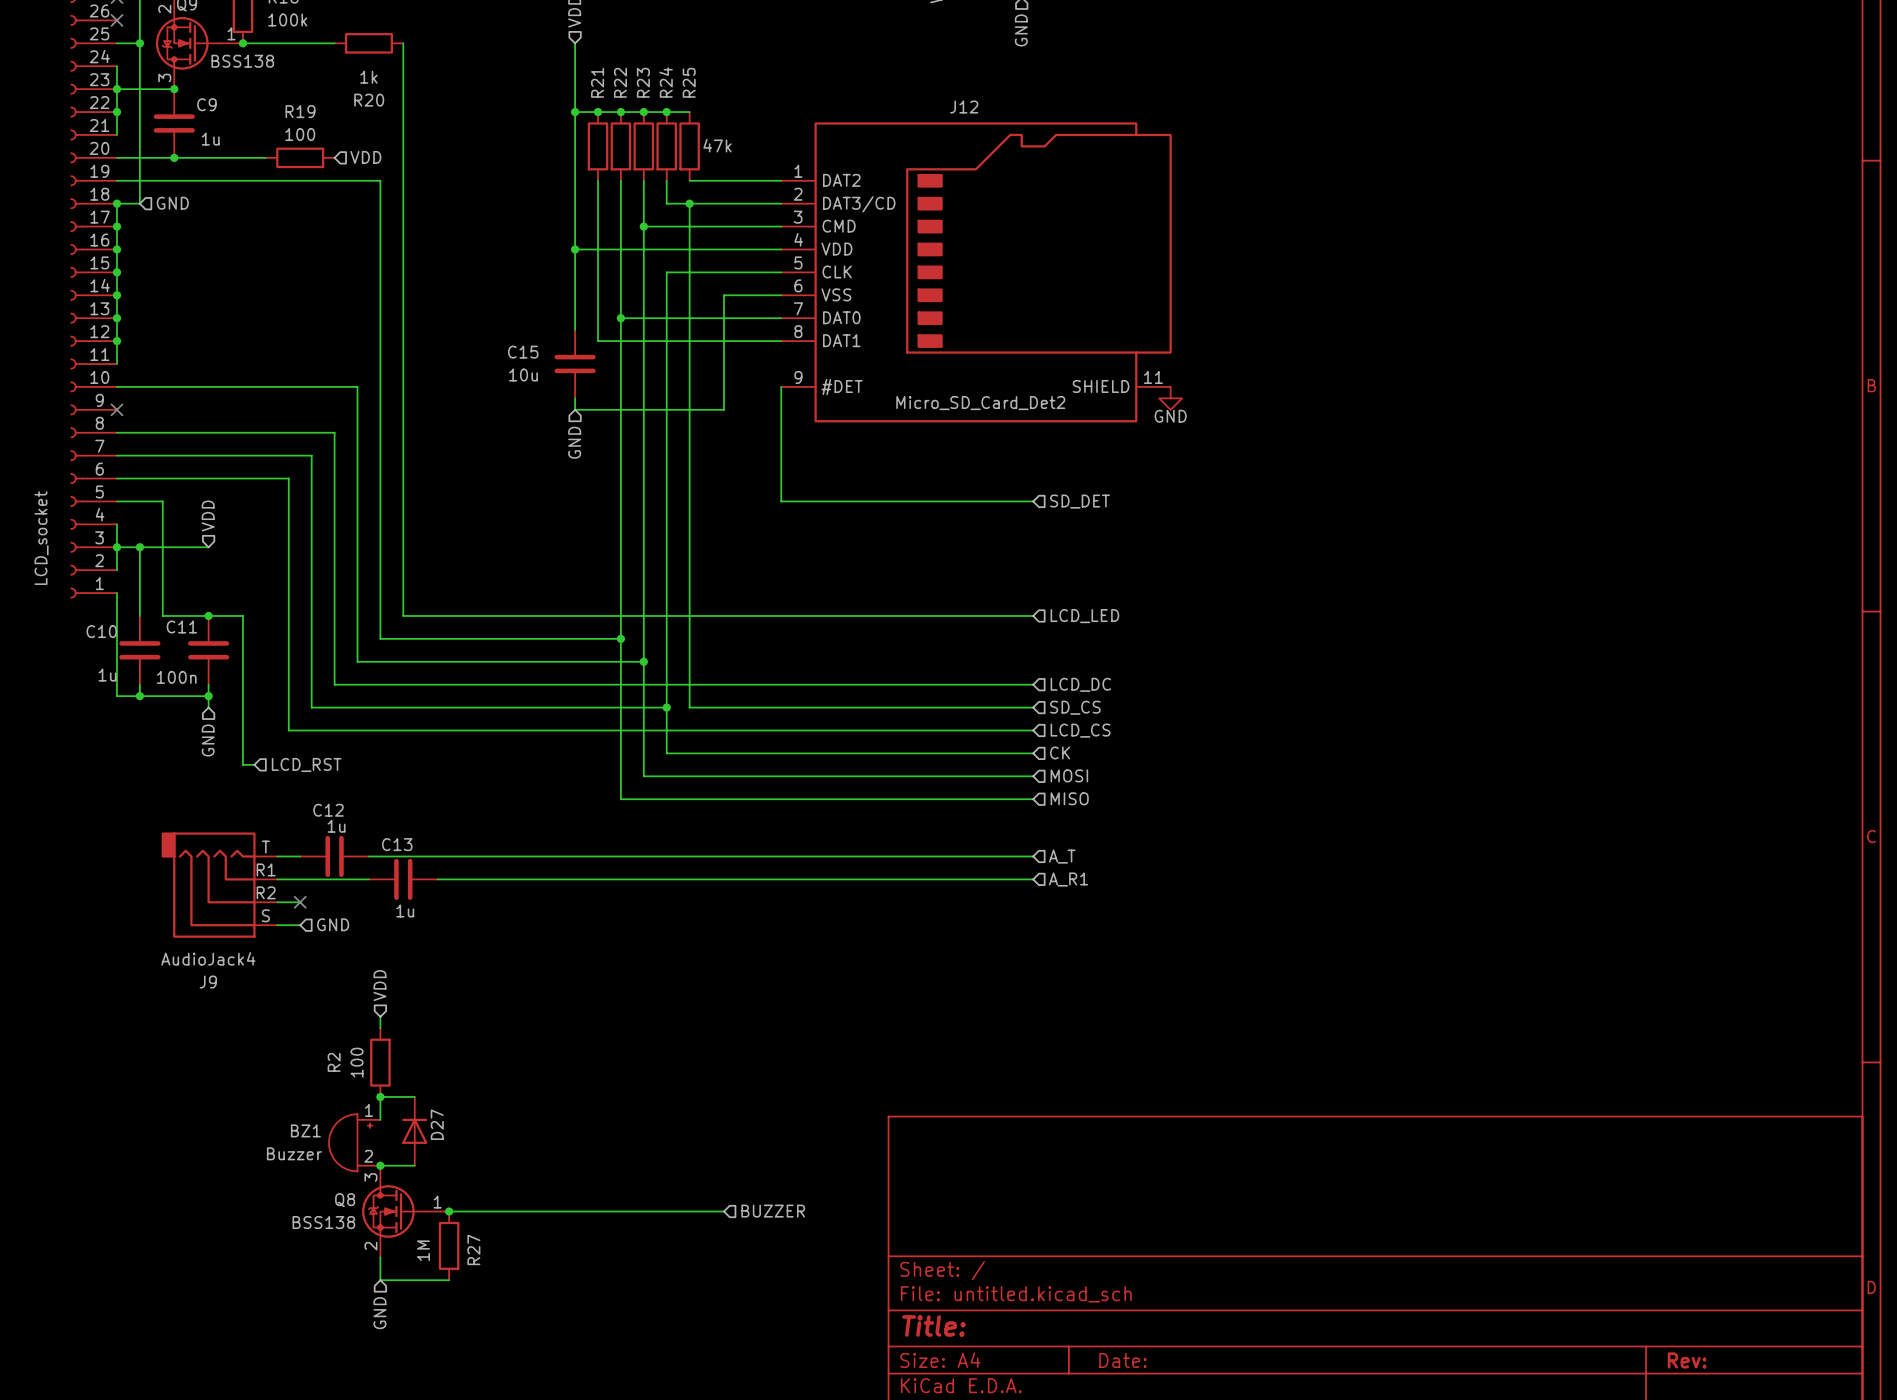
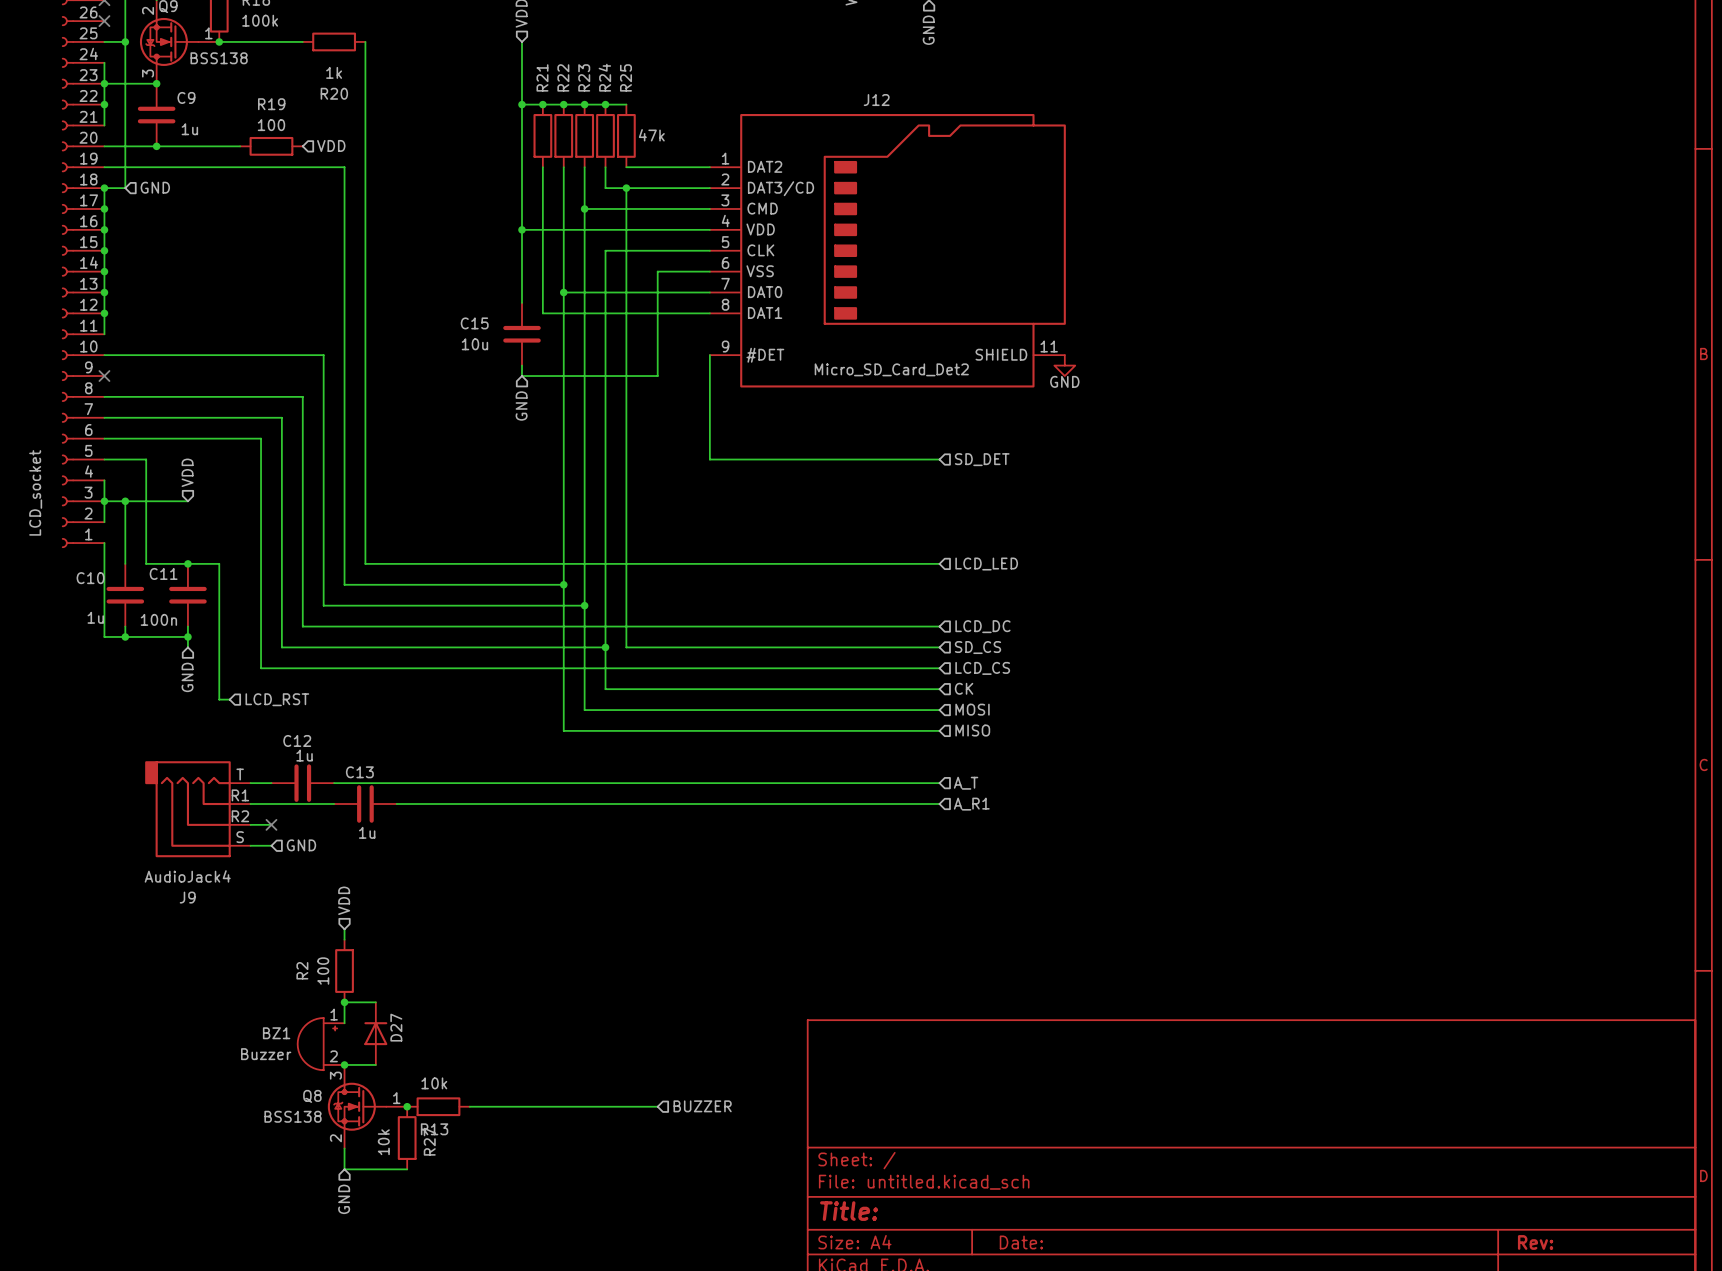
wire: (449, 1211) (517, 1211) -> none
R13: none -> 10k (438, 1106)
R27 value: 1M (423, 1250) -> 10k (383, 1142)

